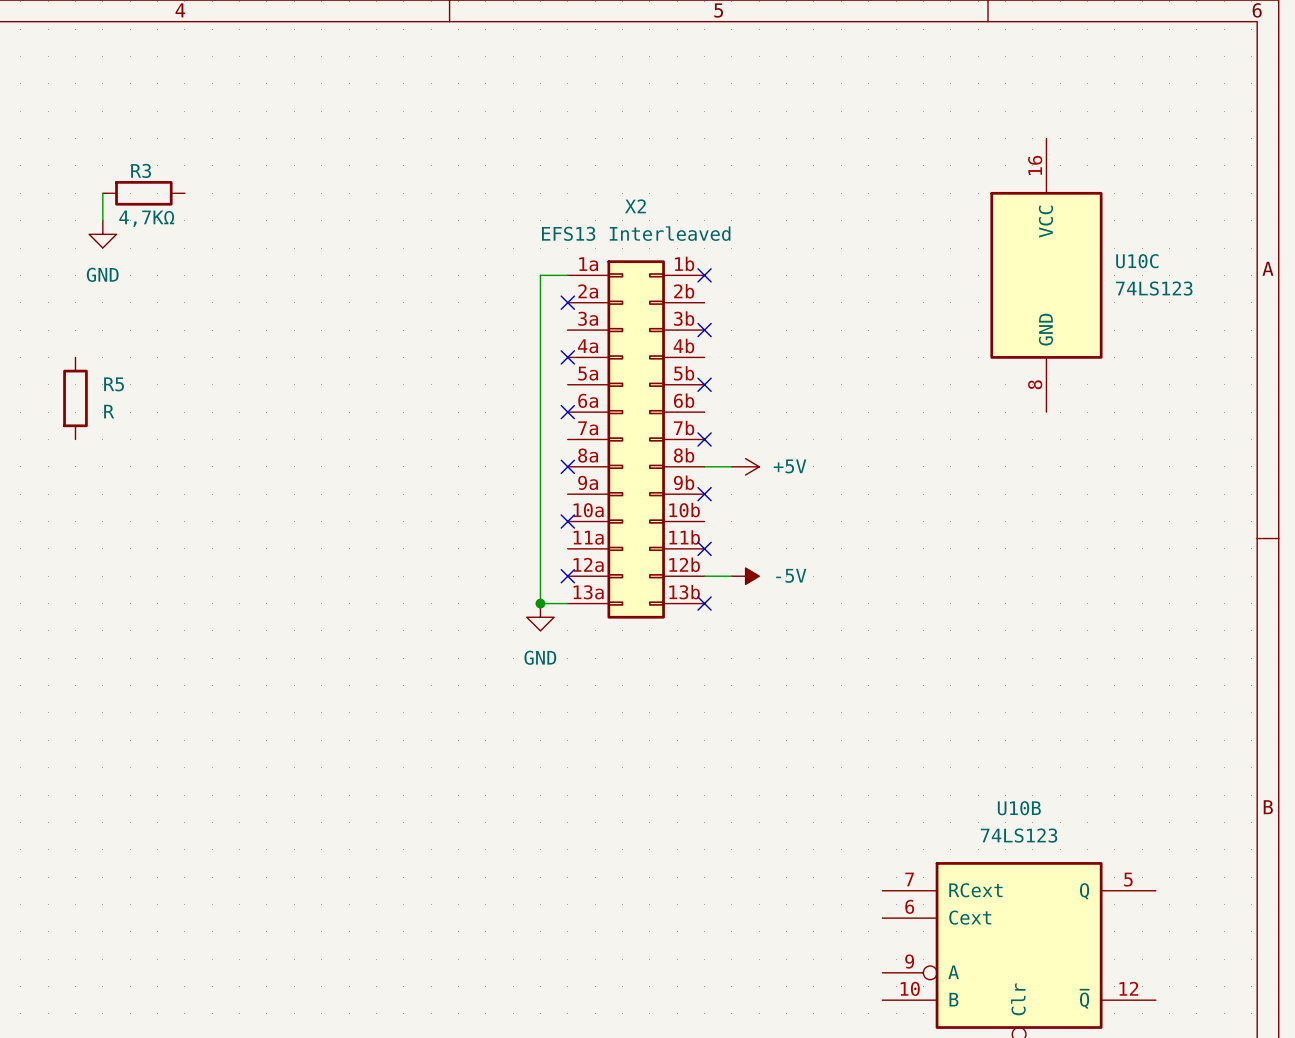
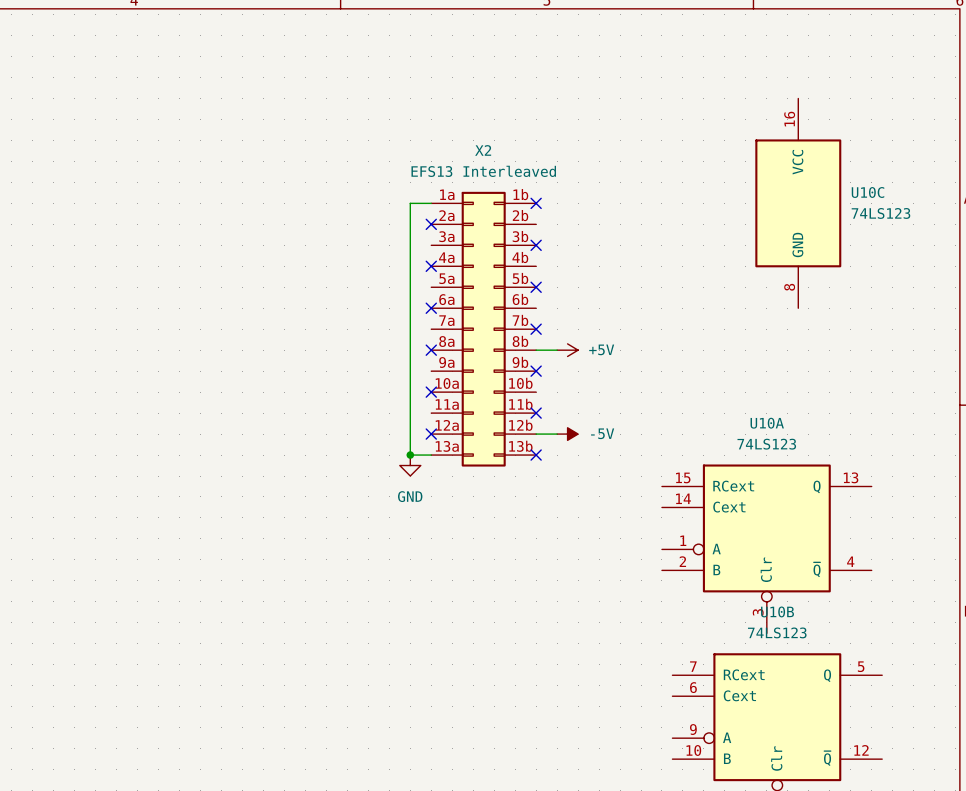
wire: (102, 193) (102, 220) -> none
R3: 4,7KΩ (143, 193) -> none
power symbol: GND (102, 234) -> none
R5: R (75, 398) -> none
U10A: none -> 74LS123 (766, 548)

